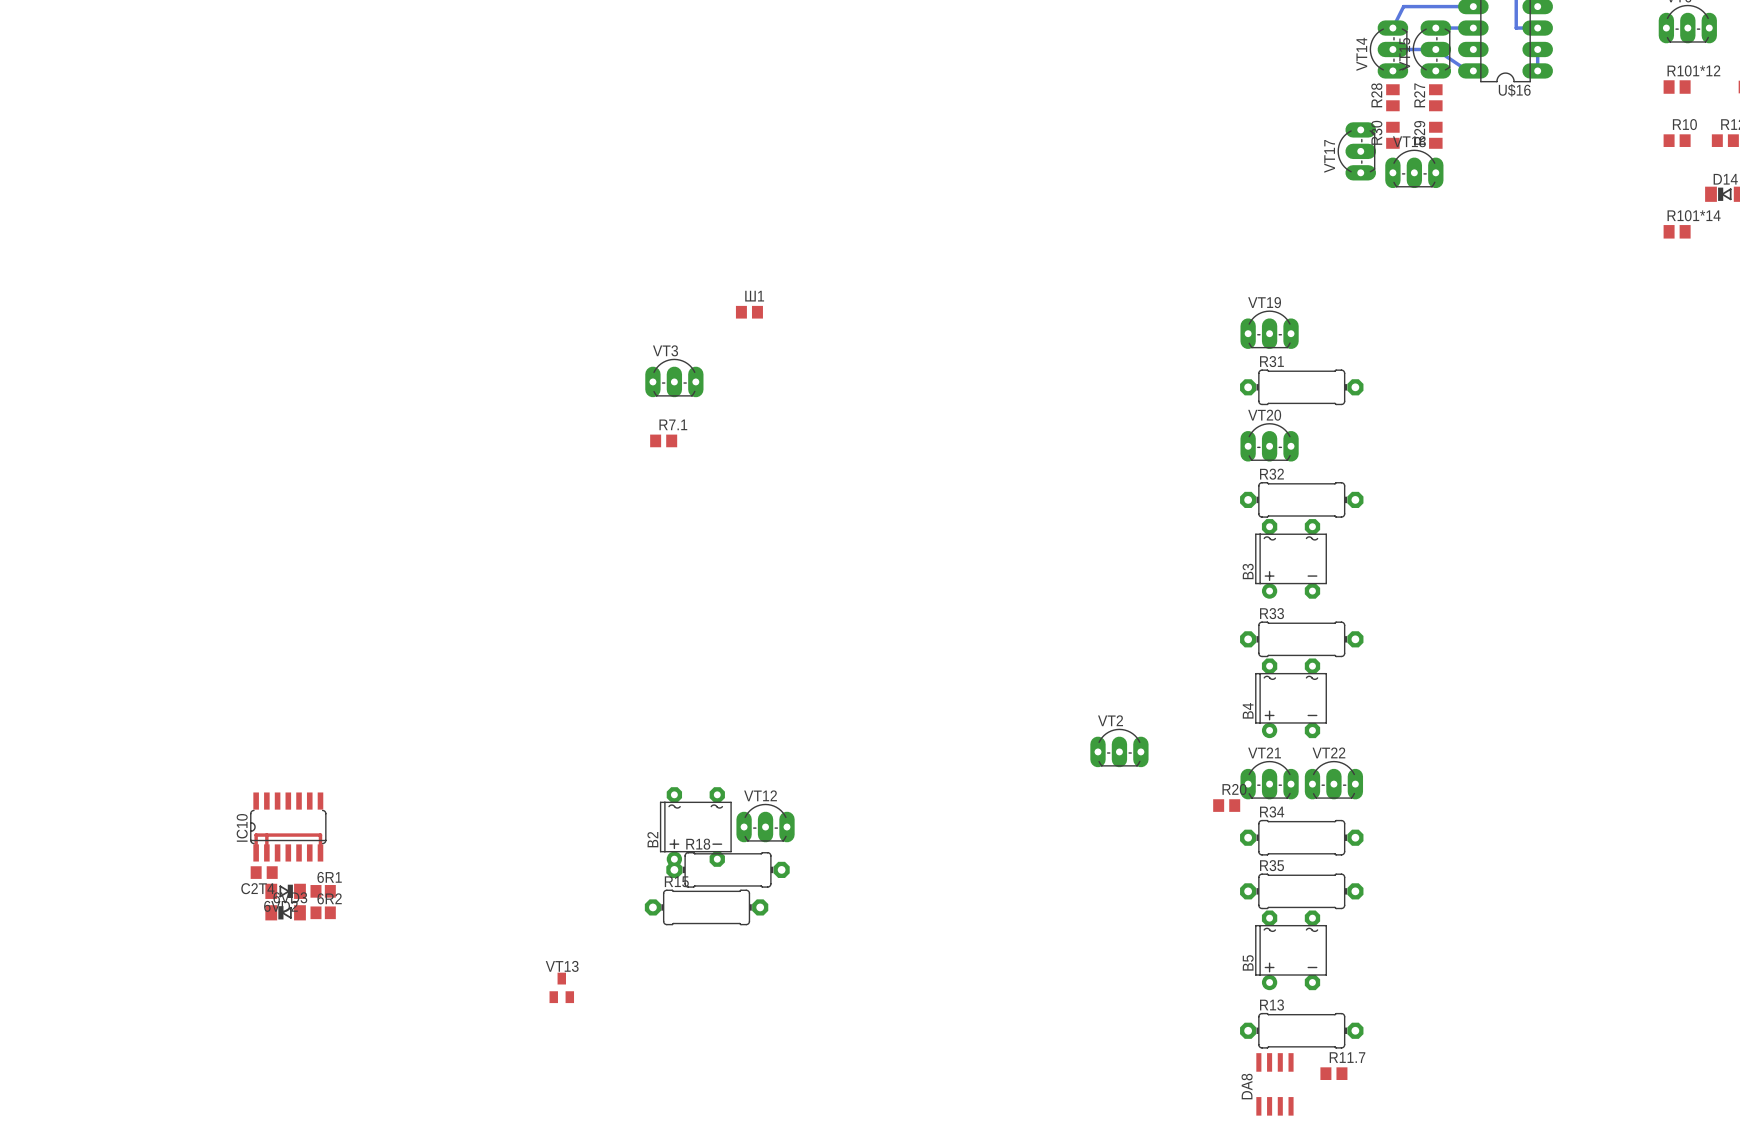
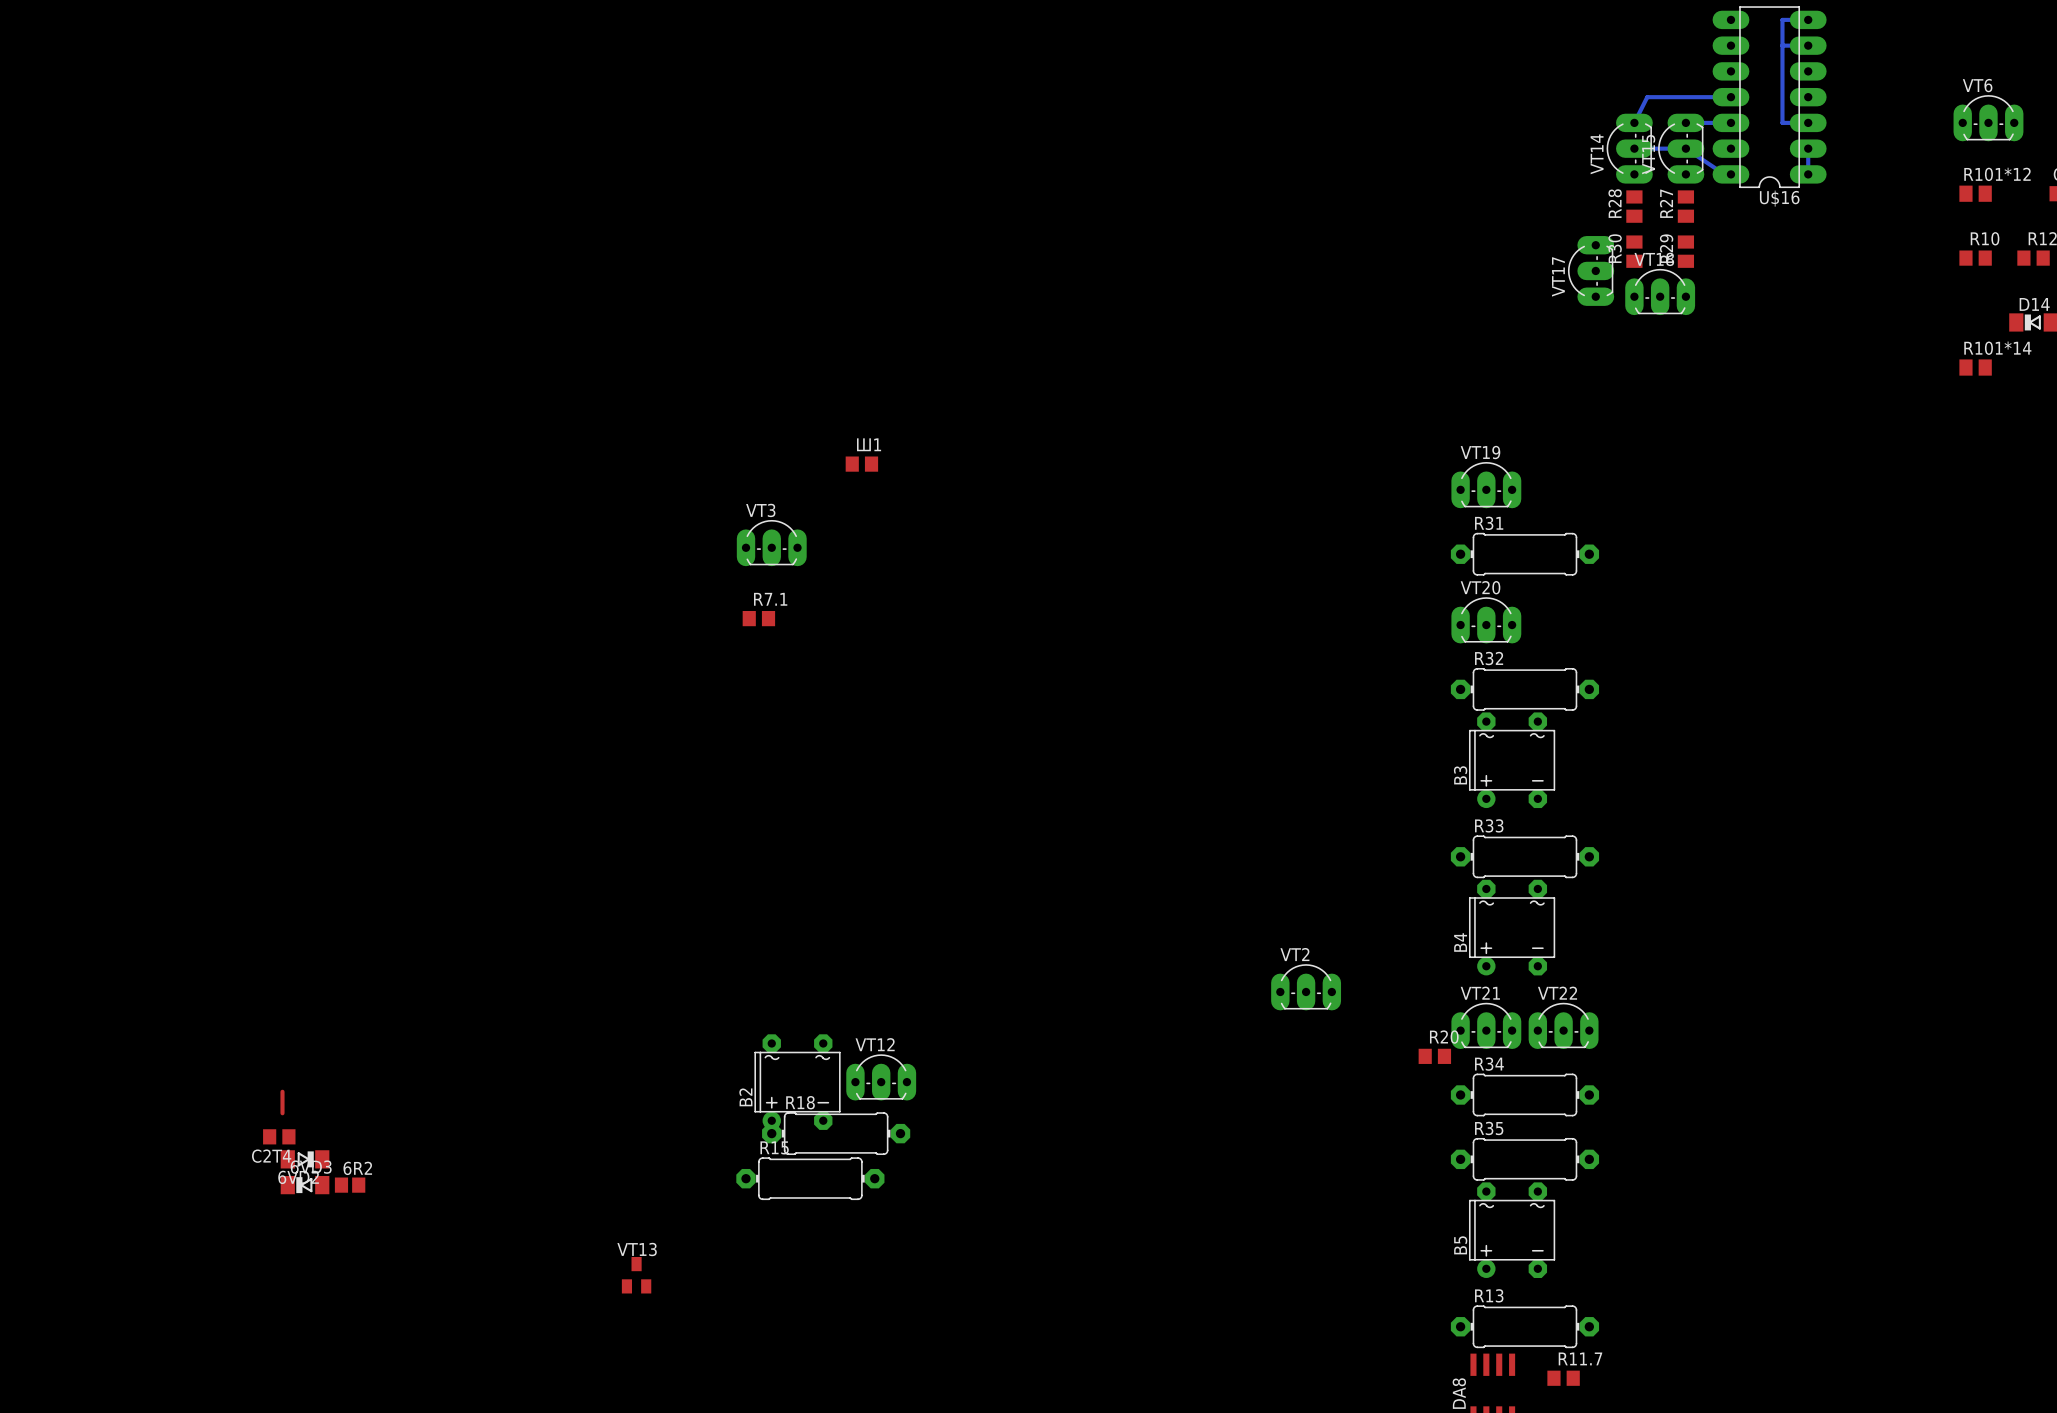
IC10: (288, 827) -> none
top track: (256, 852) (256, 835) (320, 835) (320, 852) -> none
6R1: (323, 891) -> none

